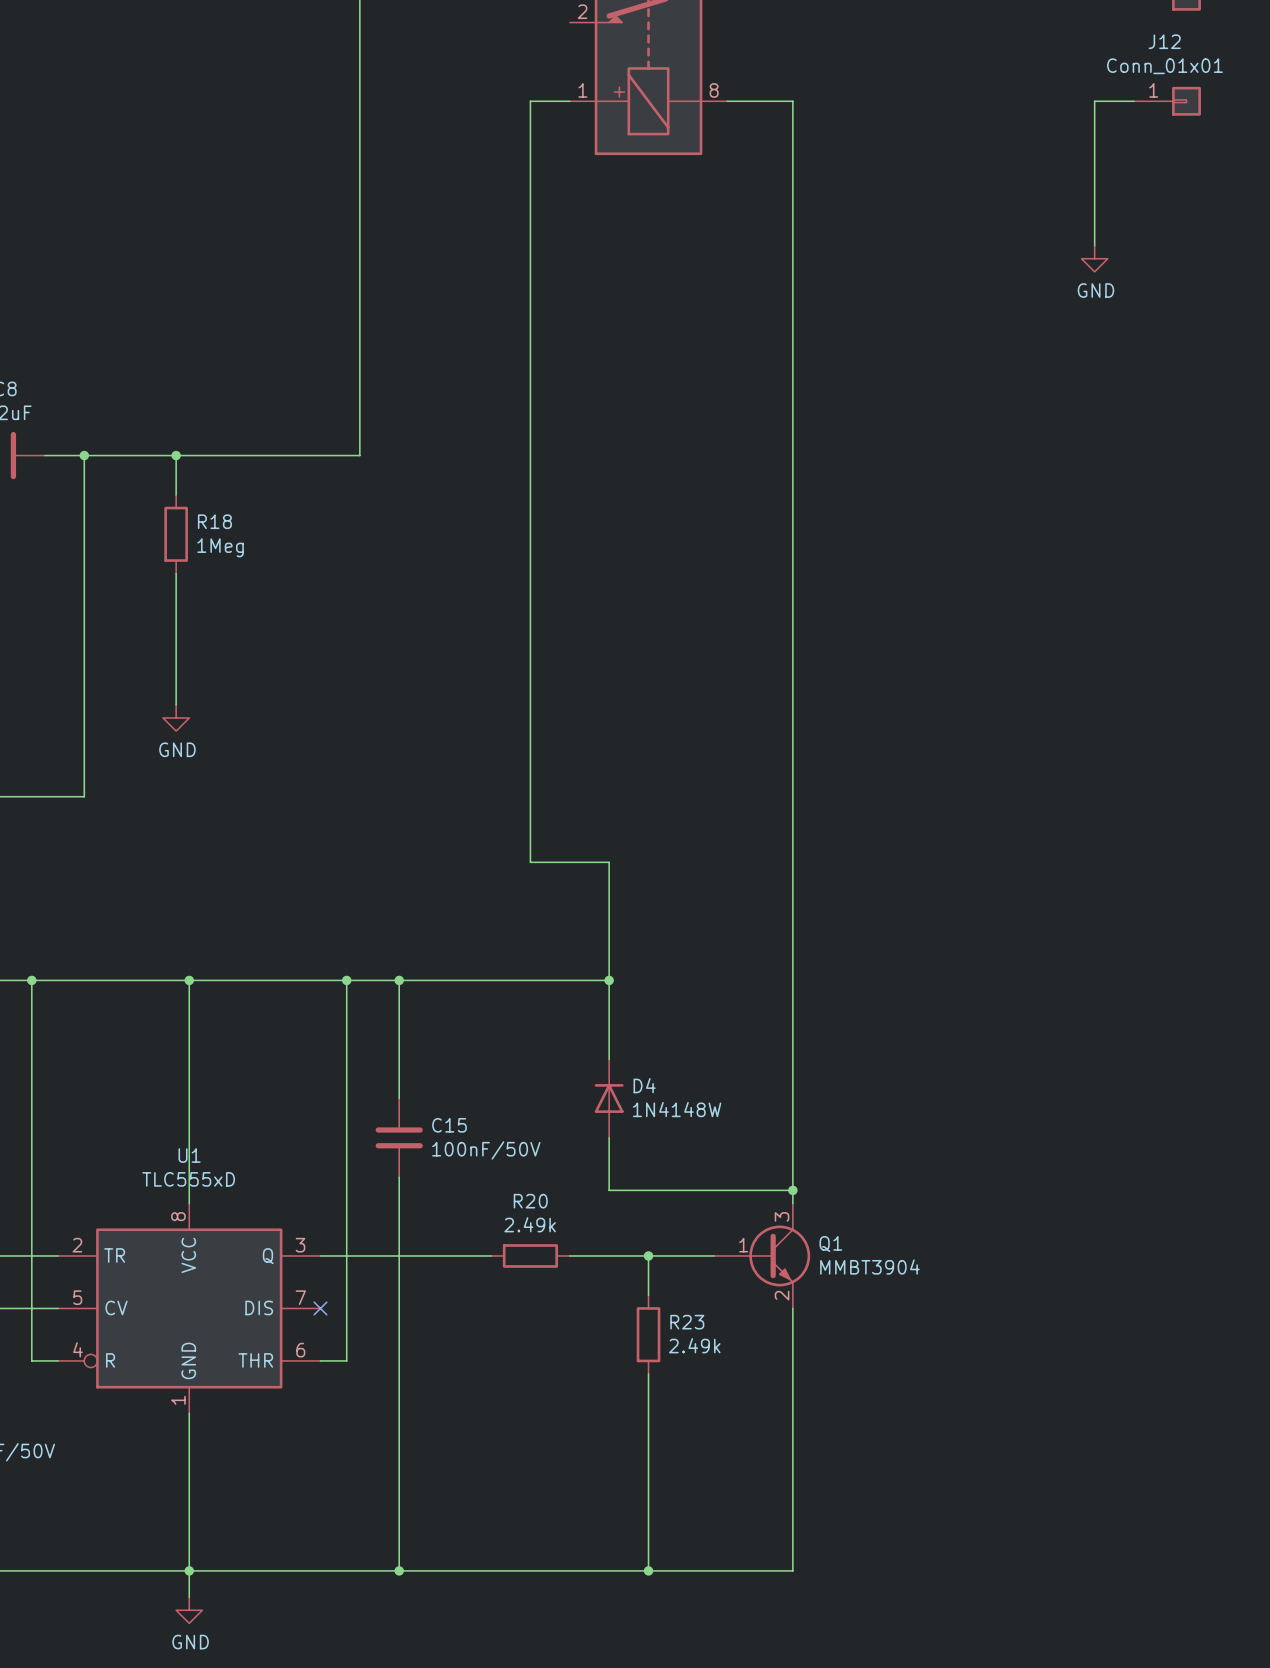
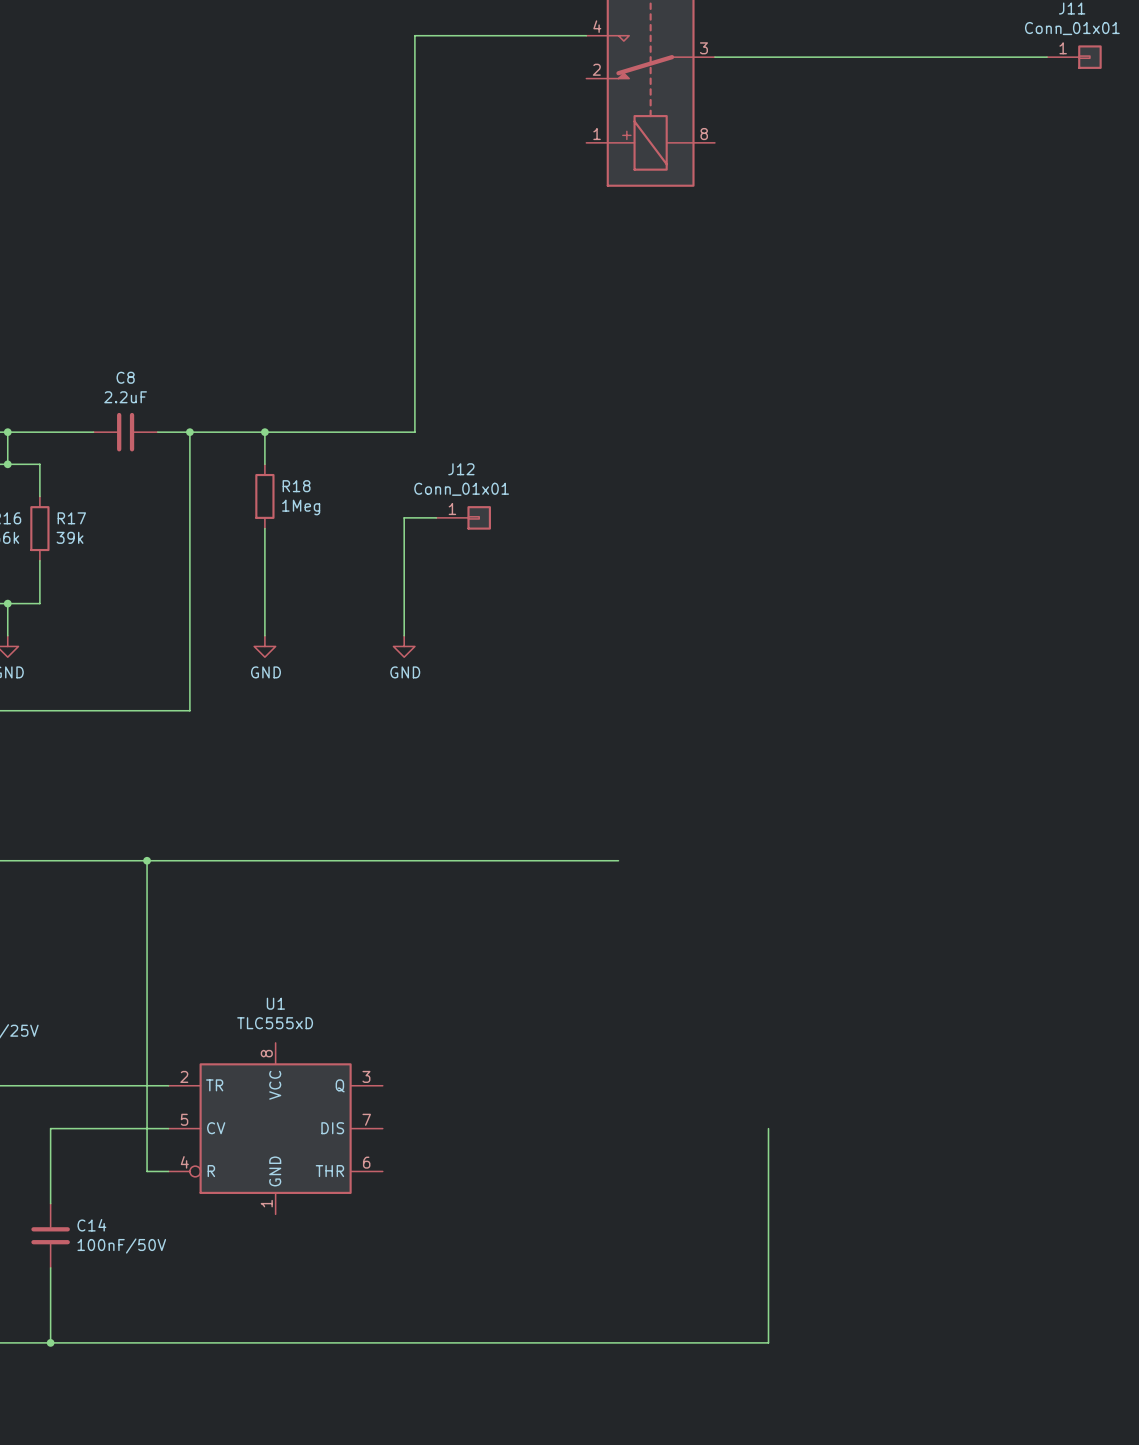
wire: (569, 101) (530, 101) (530, 862) (609, 862) (609, 1059) -> none
wire: (727, 101) (792, 101) (792, 1203) -> none
wire: (1134, 101) (1094, 101) (1094, 245) -> none
J12 position: (1167, 101) -> (463, 517)
power symbol: GND (1094, 258) -> none
wire: none -> (436, 517) (404, 517) (404, 635)
power symbol: none -> GND (404, 646)
wire: (189, 980) (189, 1203) -> none
junction: (189, 980) -> none
wire: (346, 980) (346, 1360) (320, 1360) -> none
junction: (346, 980) -> none
wire: (399, 980) (399, 1098) -> none
junction: (399, 980) -> none
junction: (609, 980) -> none
D4: 1N4148W (609, 1098) -> none
C15: 100nF/50V (399, 1137) -> none
wire: (609, 1137) (609, 1190) (792, 1190) -> none
wire: (399, 1177) (399, 1570) -> none
junction: (792, 1190) -> none
wire: (320, 1255) (491, 1255) -> none
R20: 2.49k (530, 1255) -> none
wire: (569, 1255) (714, 1255) -> none
wire: (648, 1255) (648, 1295) -> none
junction: (648, 1255) -> none
Q1: MMBT3904 (762, 1255) -> none
no-connect mark: (320, 1308) -> none
R23: 2.49k (648, 1334) -> none
wire: (648, 1374) (648, 1570) -> none
wire: (189, 1413) (189, 1597) -> none
junction: (189, 1570) -> none
junction: (399, 1570) -> none
junction: (648, 1570) -> none
power symbol: GND (189, 1610) -> none

